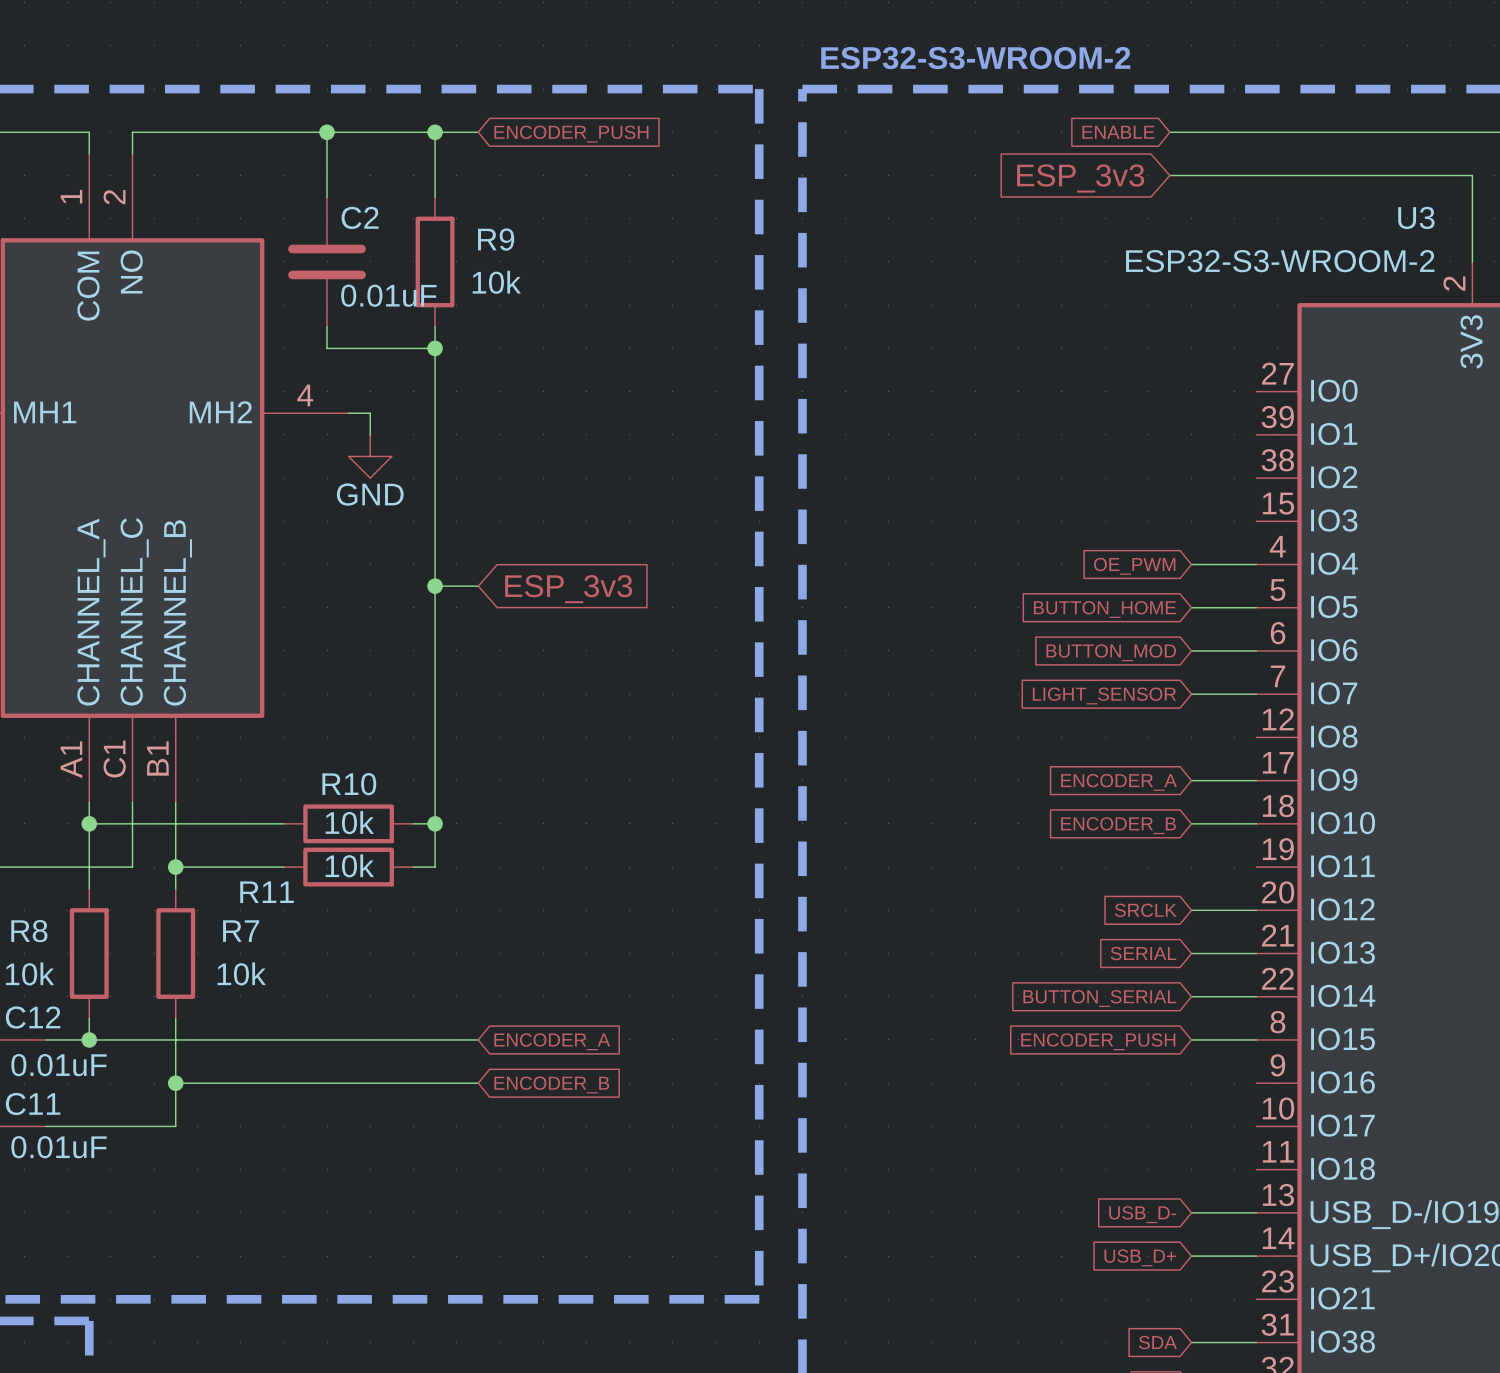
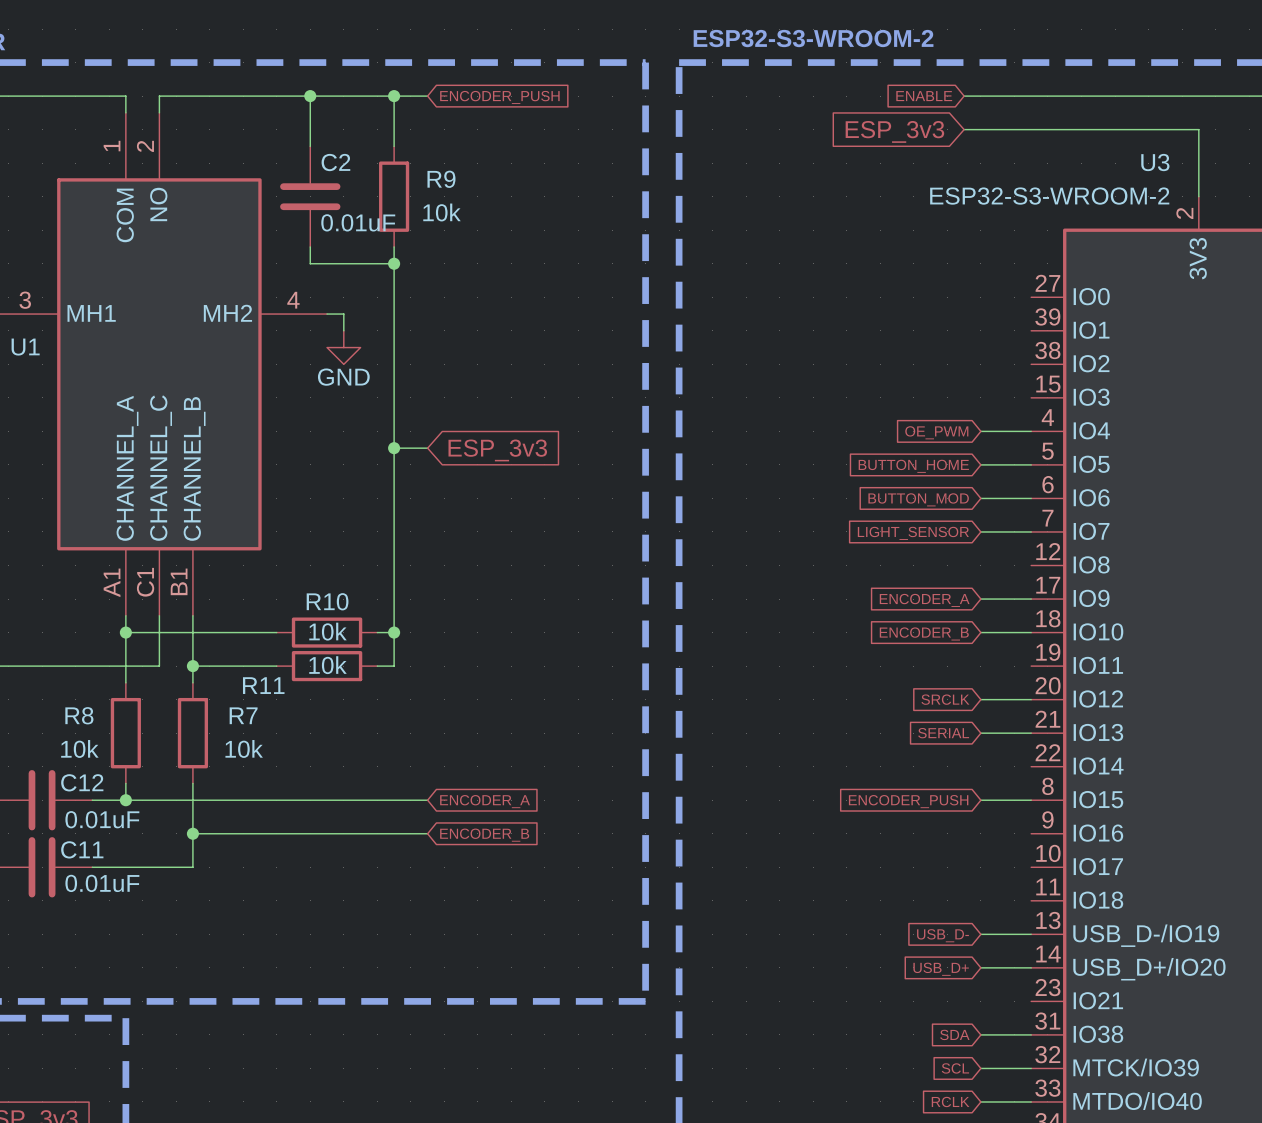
wire: (1191, 996) (1256, 996) -> none
global label: BUTTON_SERIAL (1099, 998) -> none

